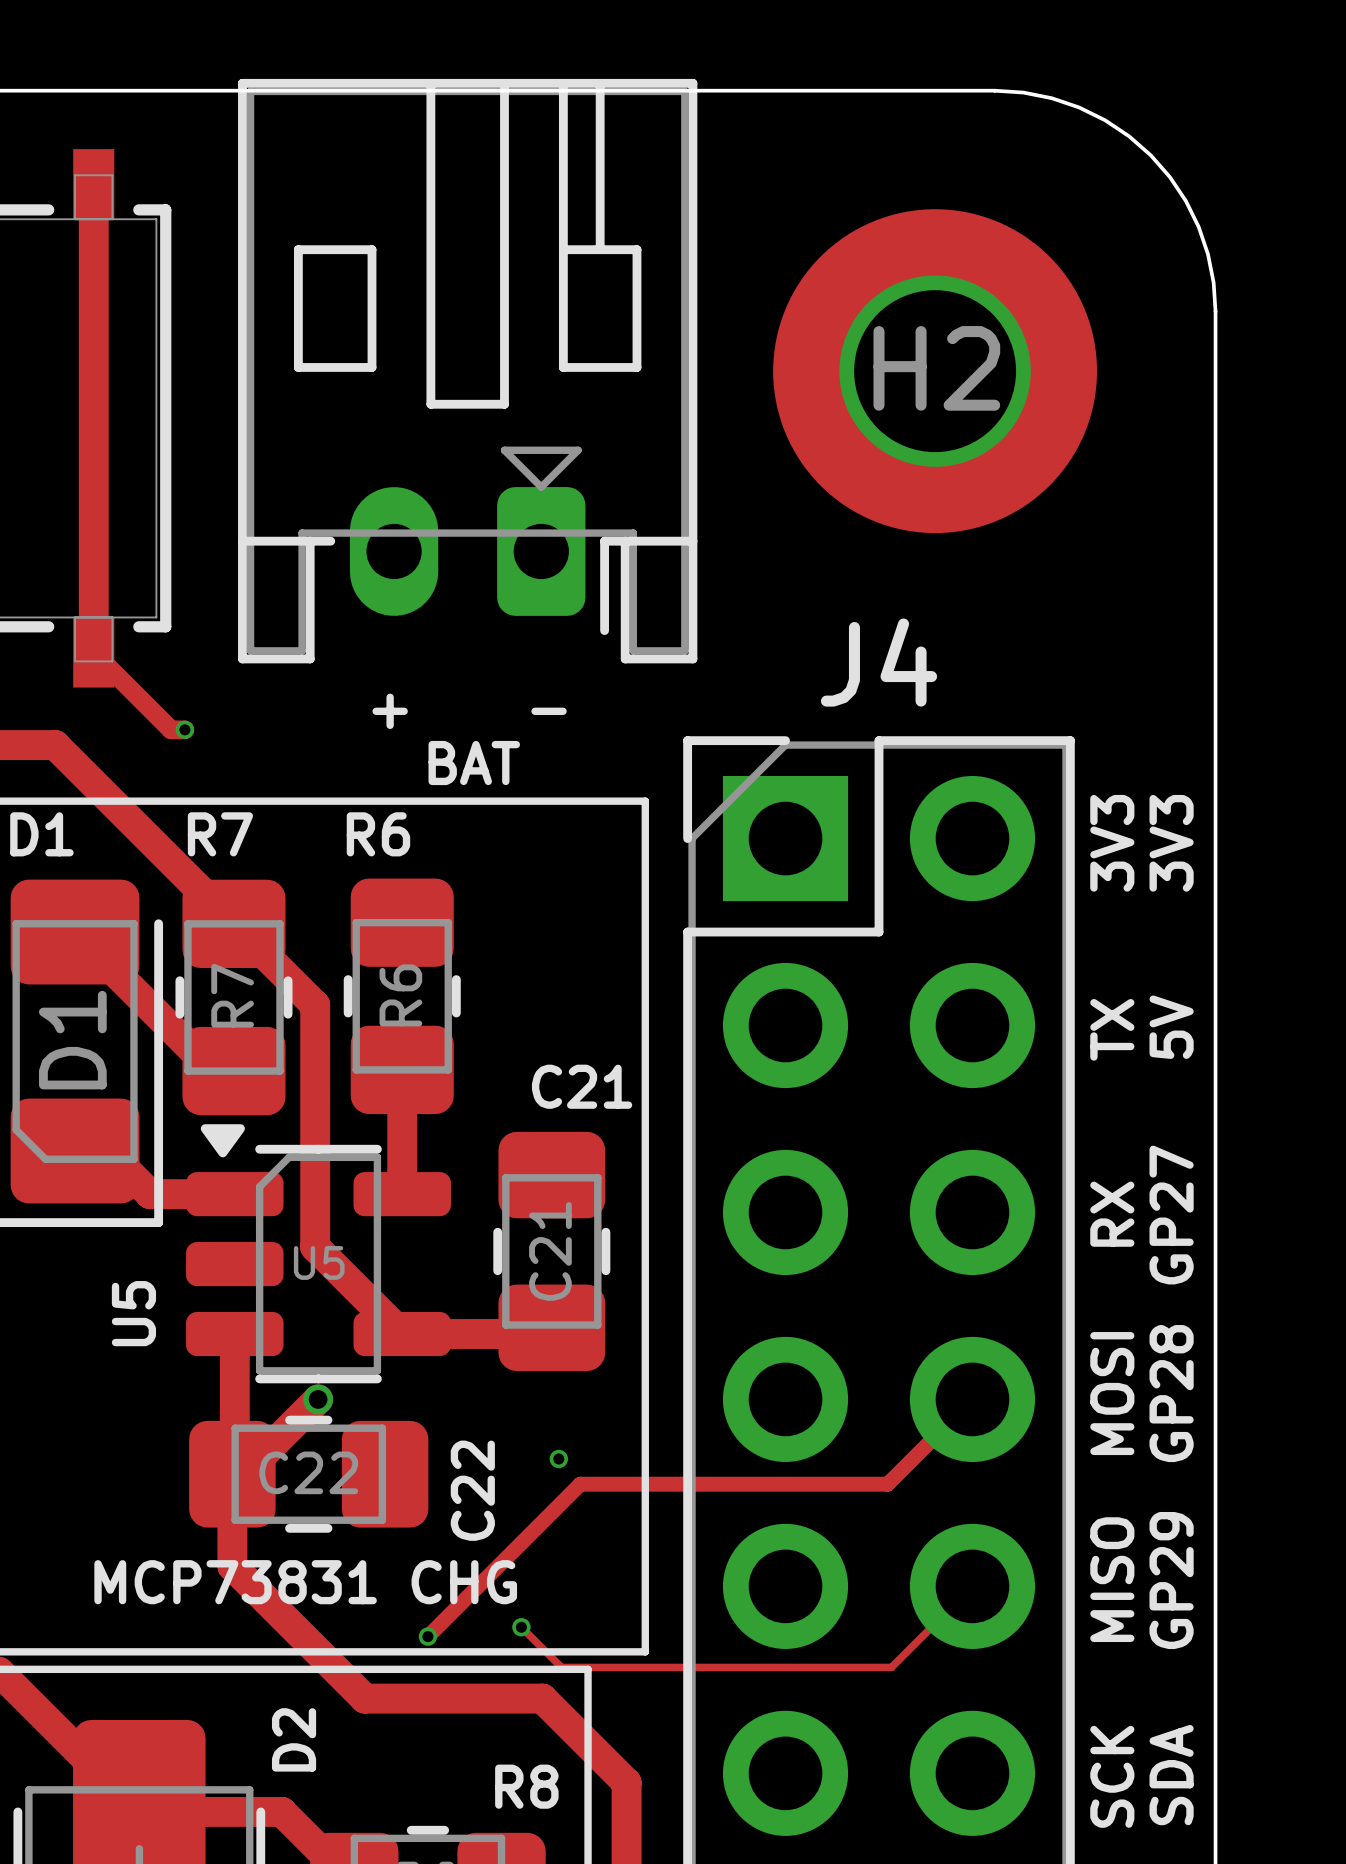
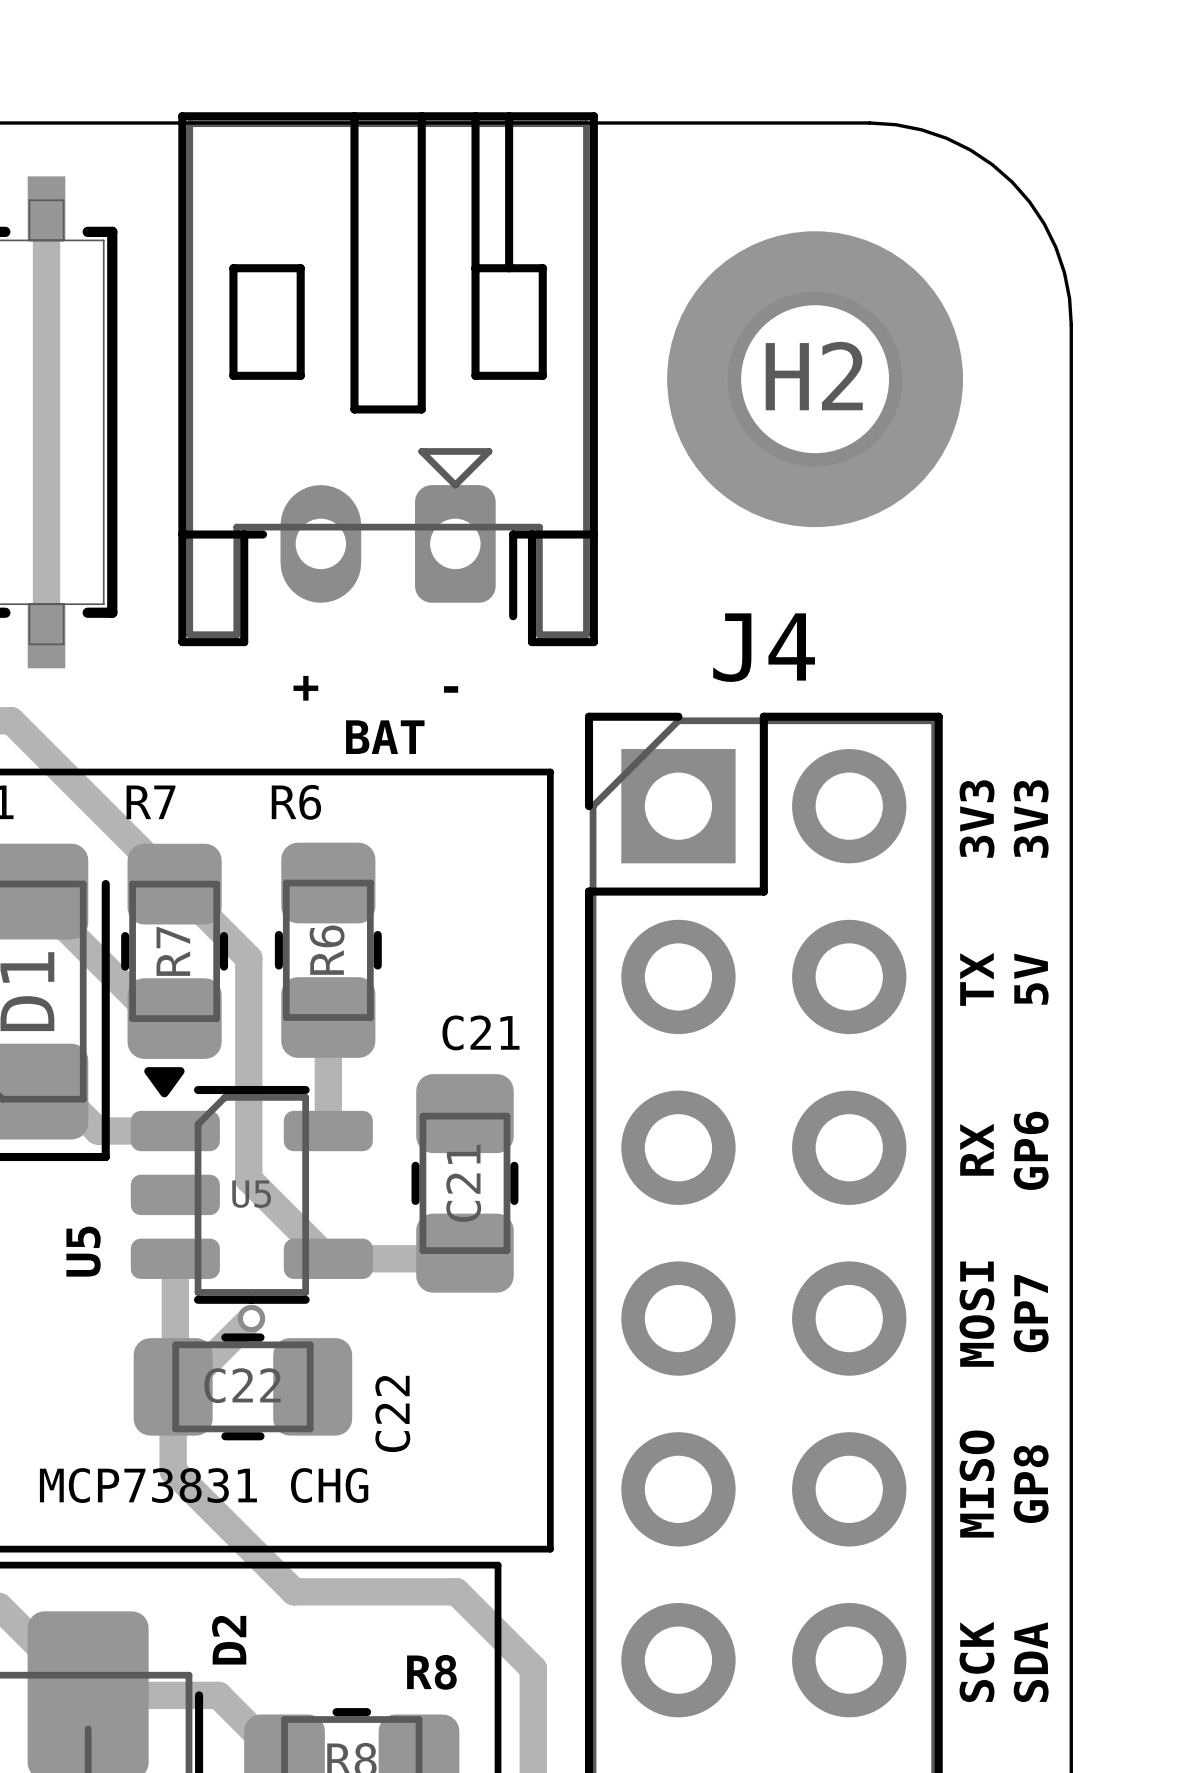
track: (93, 652) (171, 729) (184, 729) -> none
via: (184, 729) -> none
text: GP27 (1171, 1215) -> GP6 (1031, 1150)
text: GP28 (1171, 1393) -> GP7 (1031, 1313)
track: (972, 1399) (887, 1484) (580, 1484) (427, 1636) -> none
via: (558, 1458) -> none
text: GP29 (1171, 1580) -> GP8 (1031, 1484)
track: (972, 1586) (891, 1667) (561, 1667) (521, 1627) -> none
via: (521, 1627) -> none
via: (427, 1636) -> none

